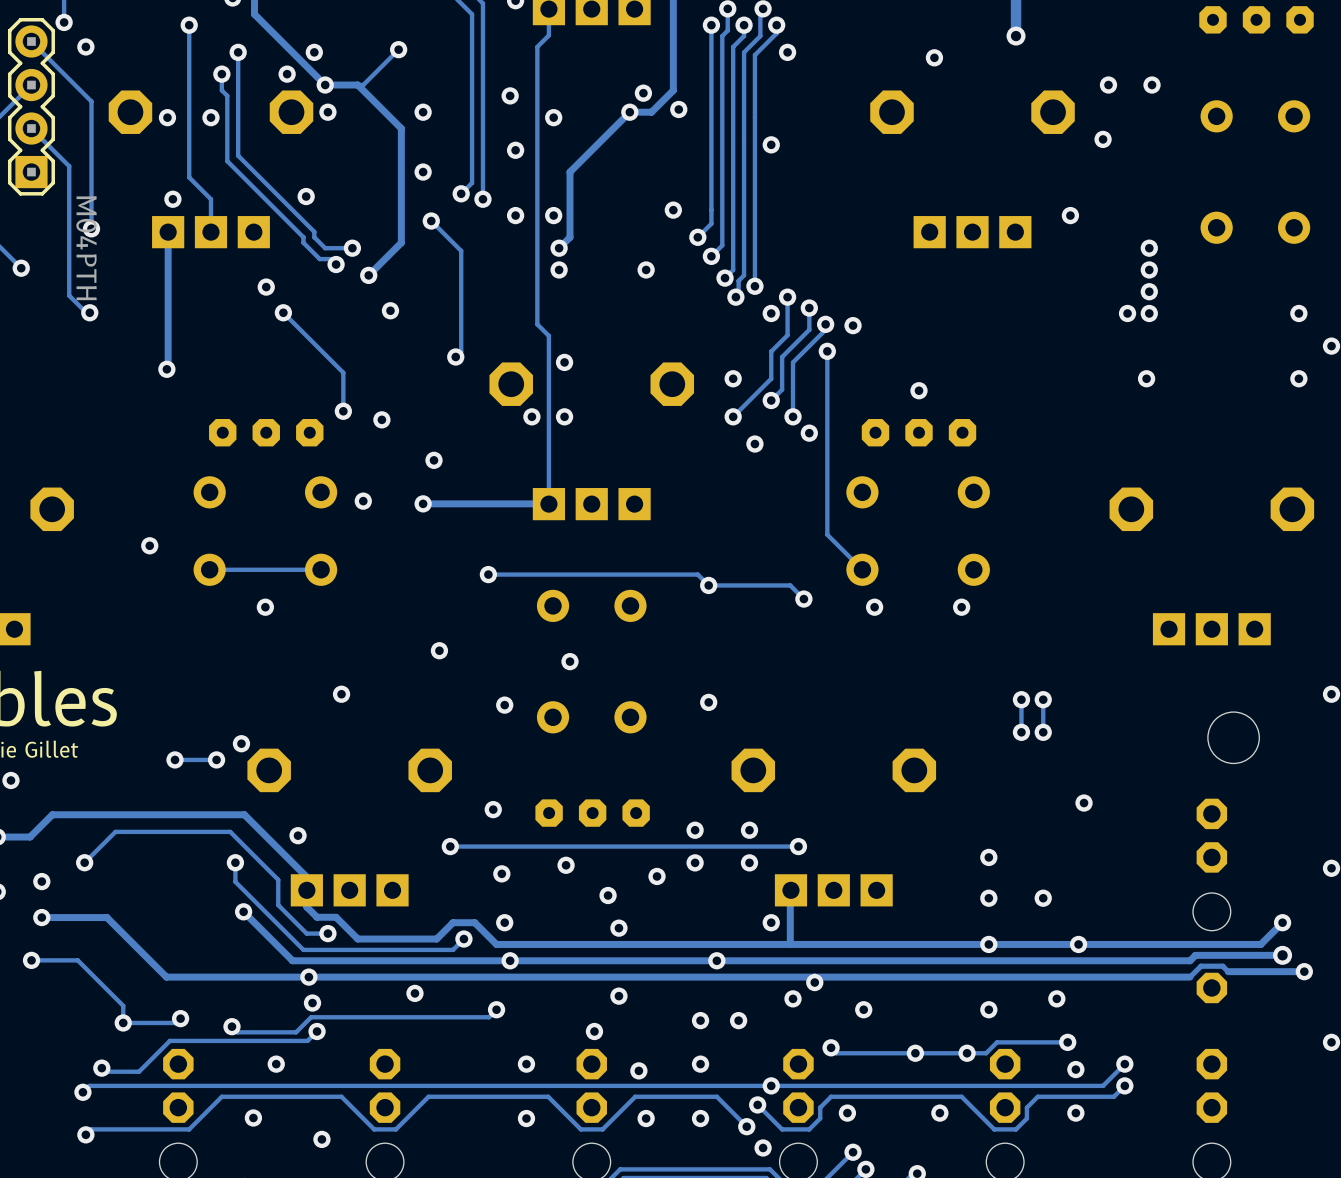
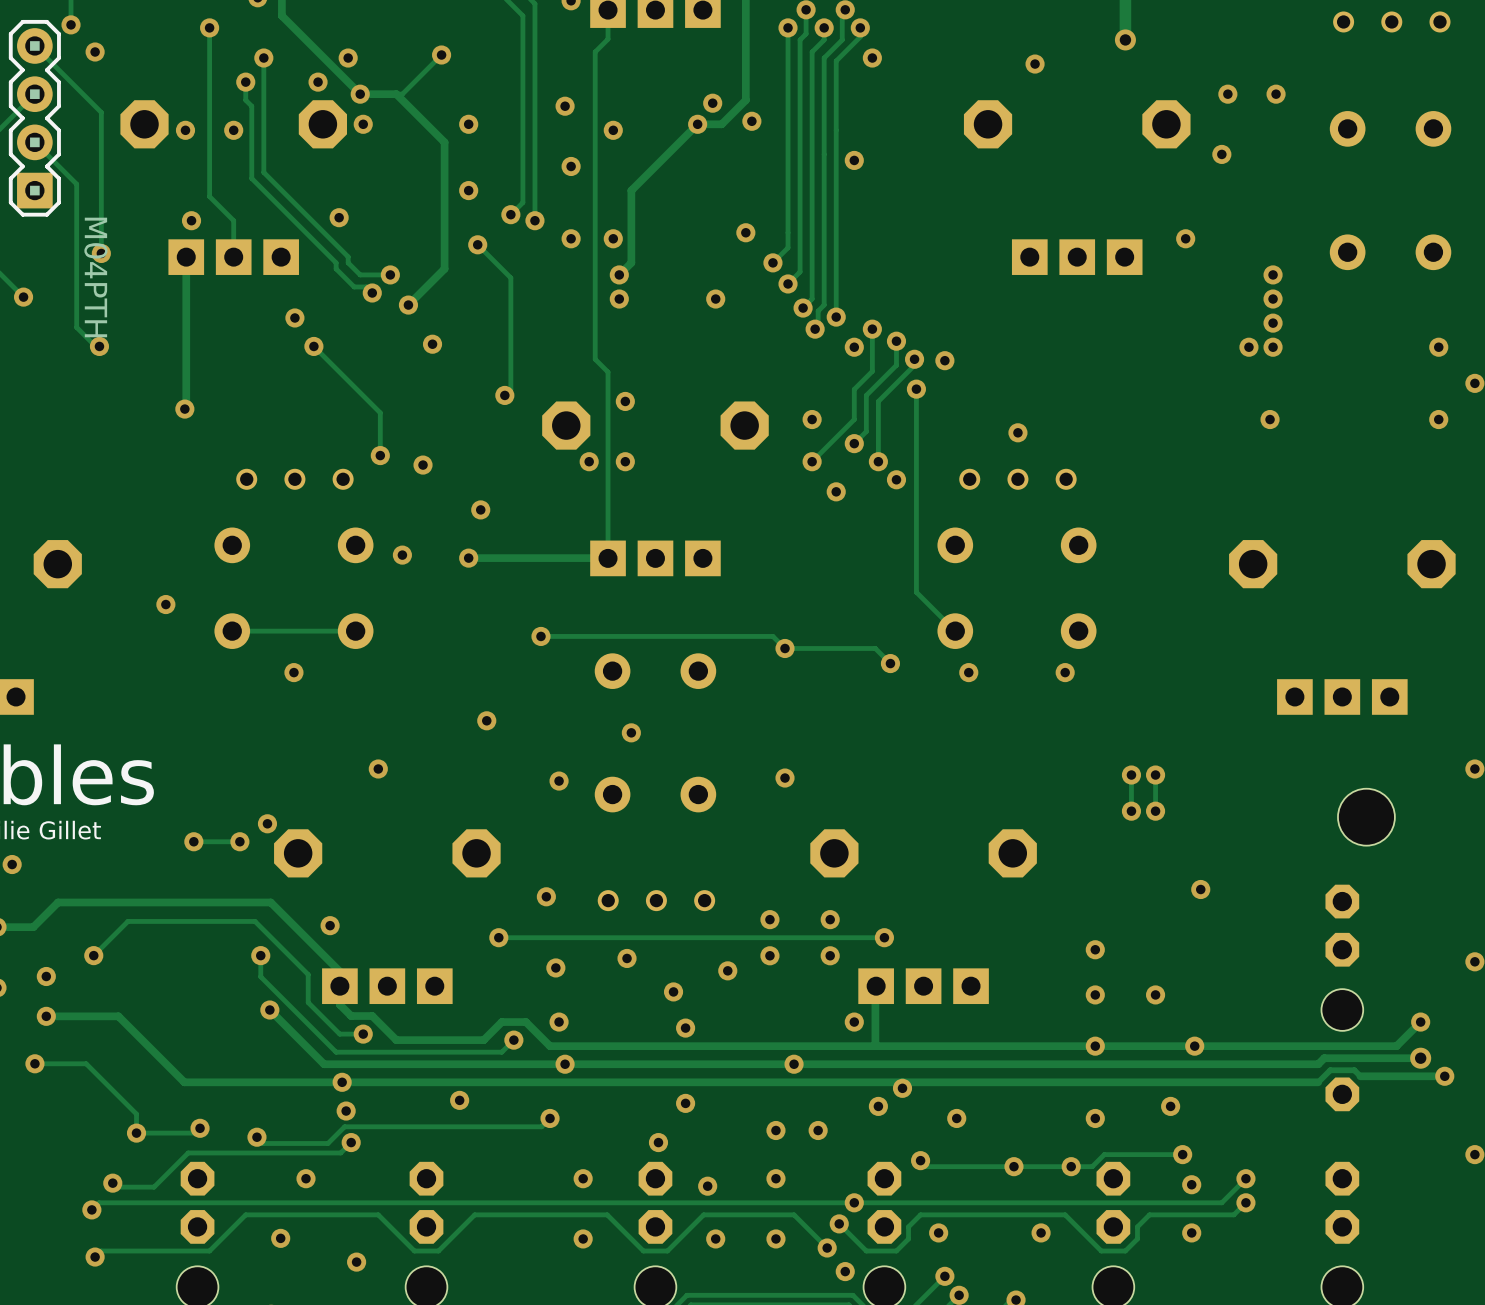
part footprint: [1199, 6, 1314, 34] -> [1333, 11, 1451, 33]
part footprint: [209, 418, 324, 447] -> [236, 468, 354, 490]
part footprint: [861, 418, 977, 447] -> [959, 468, 1077, 490]
part footprint: [535, 799, 650, 827] -> [597, 890, 716, 912]

